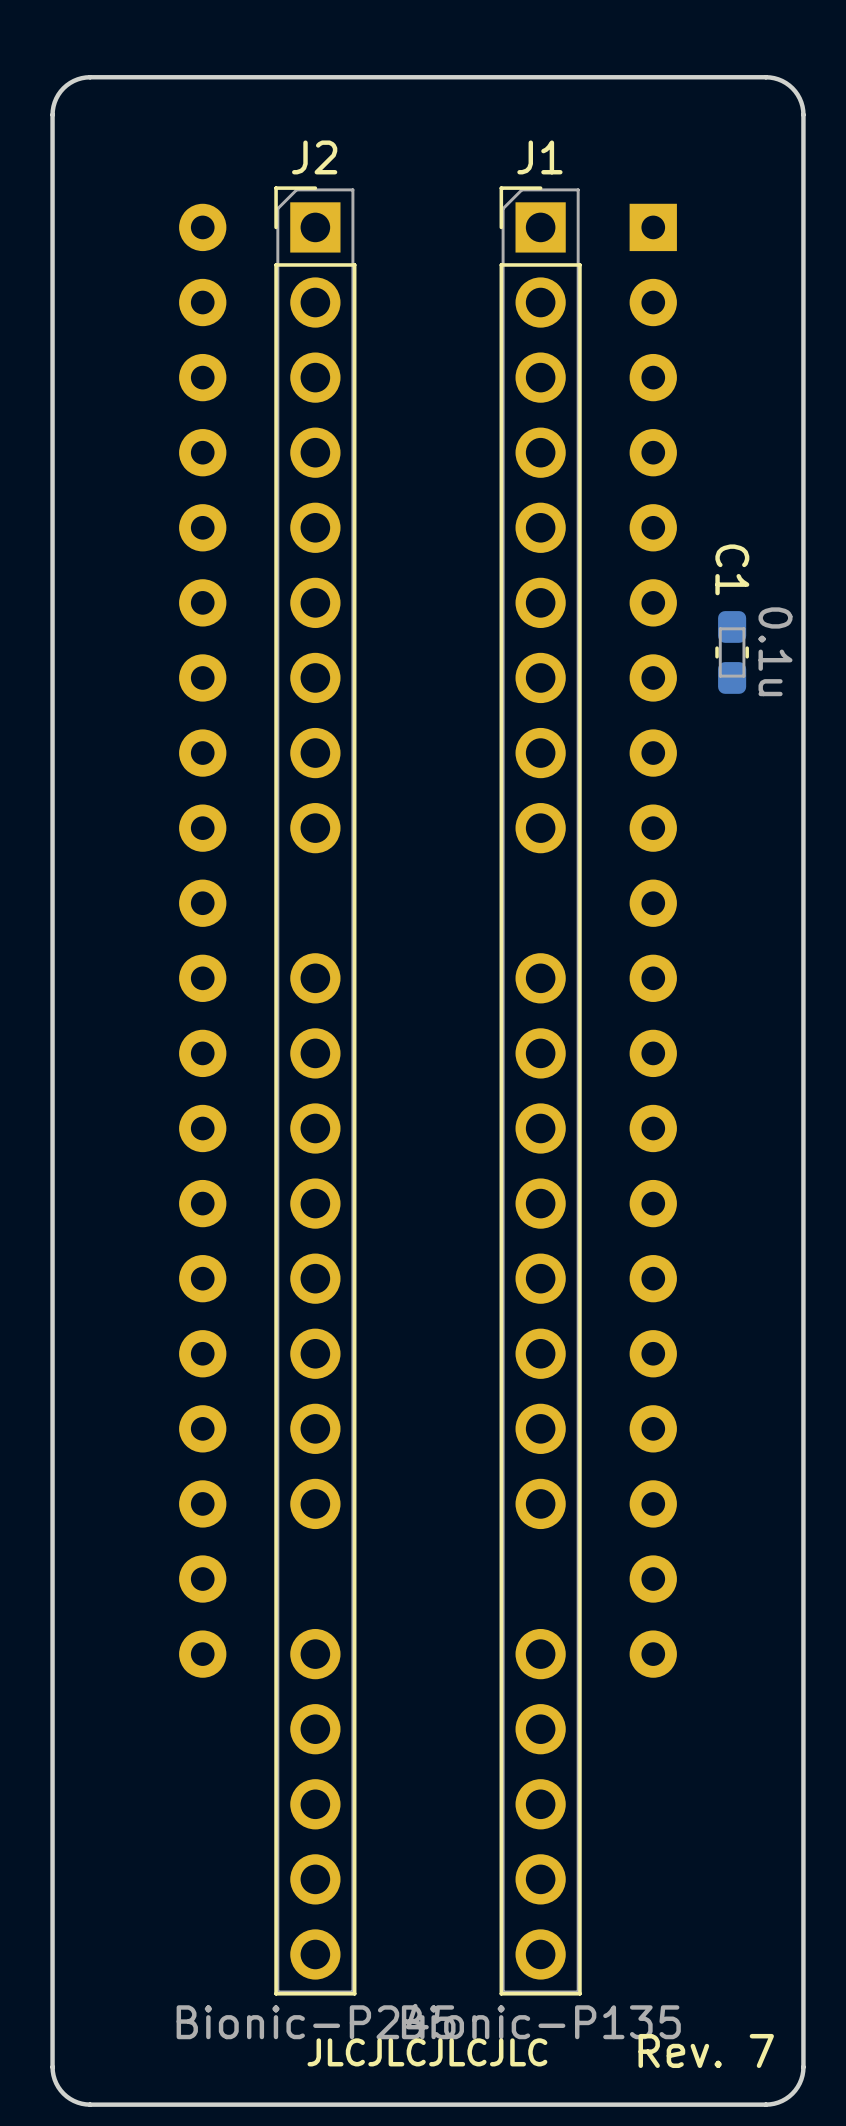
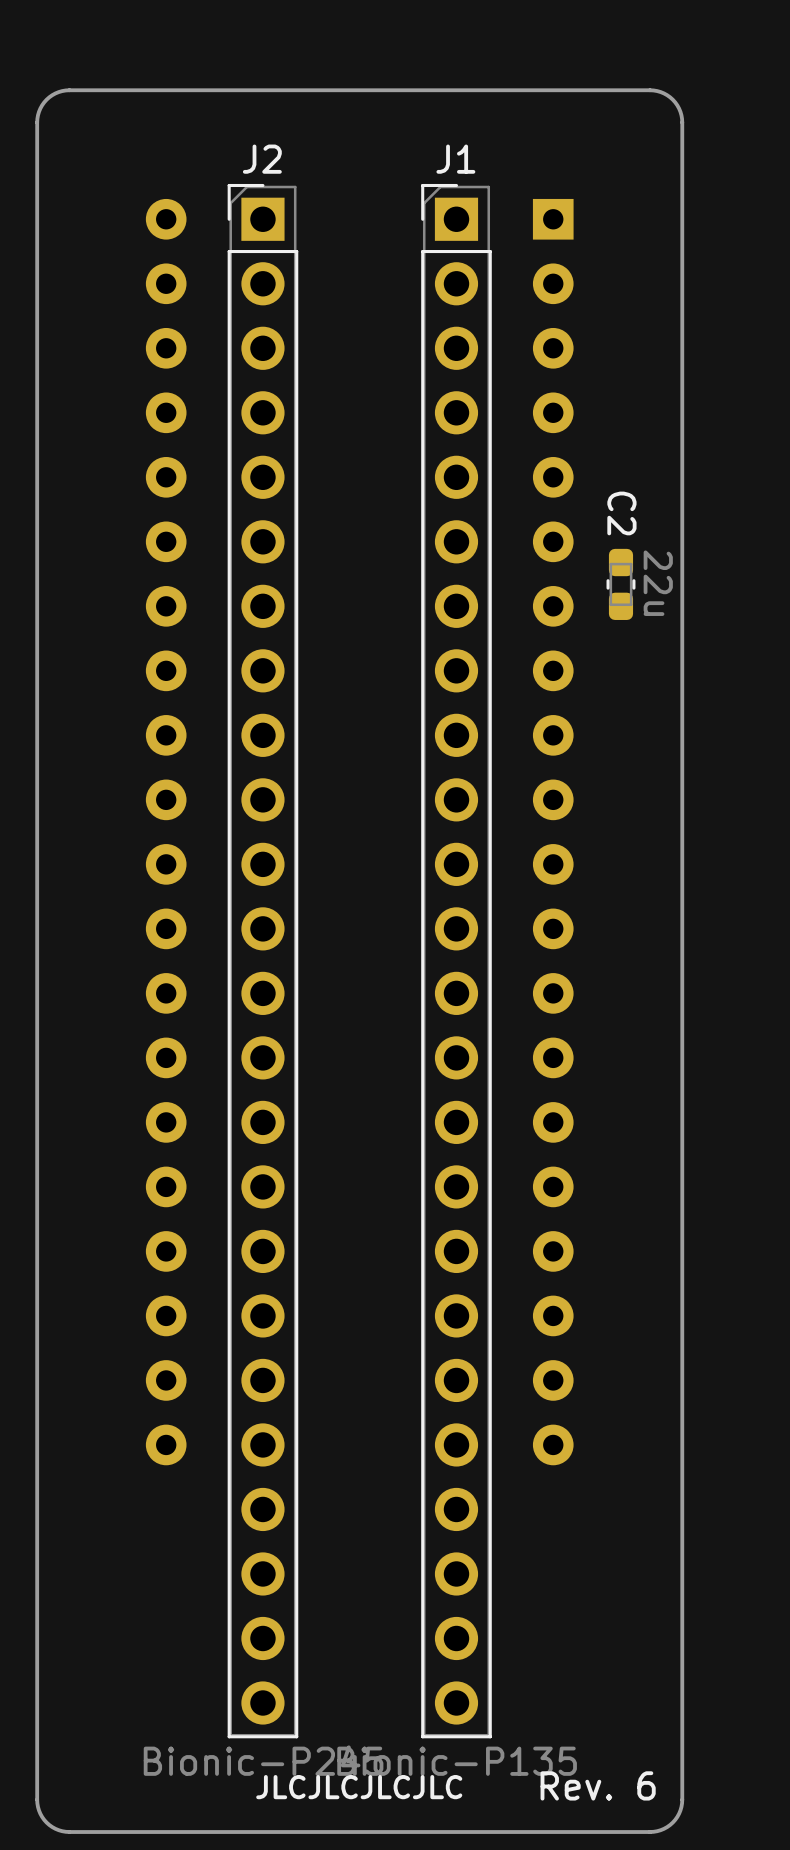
J2 footprint: [274, 186, 357, 1996] -> [227, 183, 299, 1739]
J1 footprint: [499, 186, 582, 1996] -> [421, 183, 492, 1739]
C1 name: C1 (732, 569) -> C2 (621, 513)
C1 value: 0.1u (775, 651) -> 22u (658, 583)
text: Rev. 7 (706, 2050) -> Rev. 6 (598, 1785)

